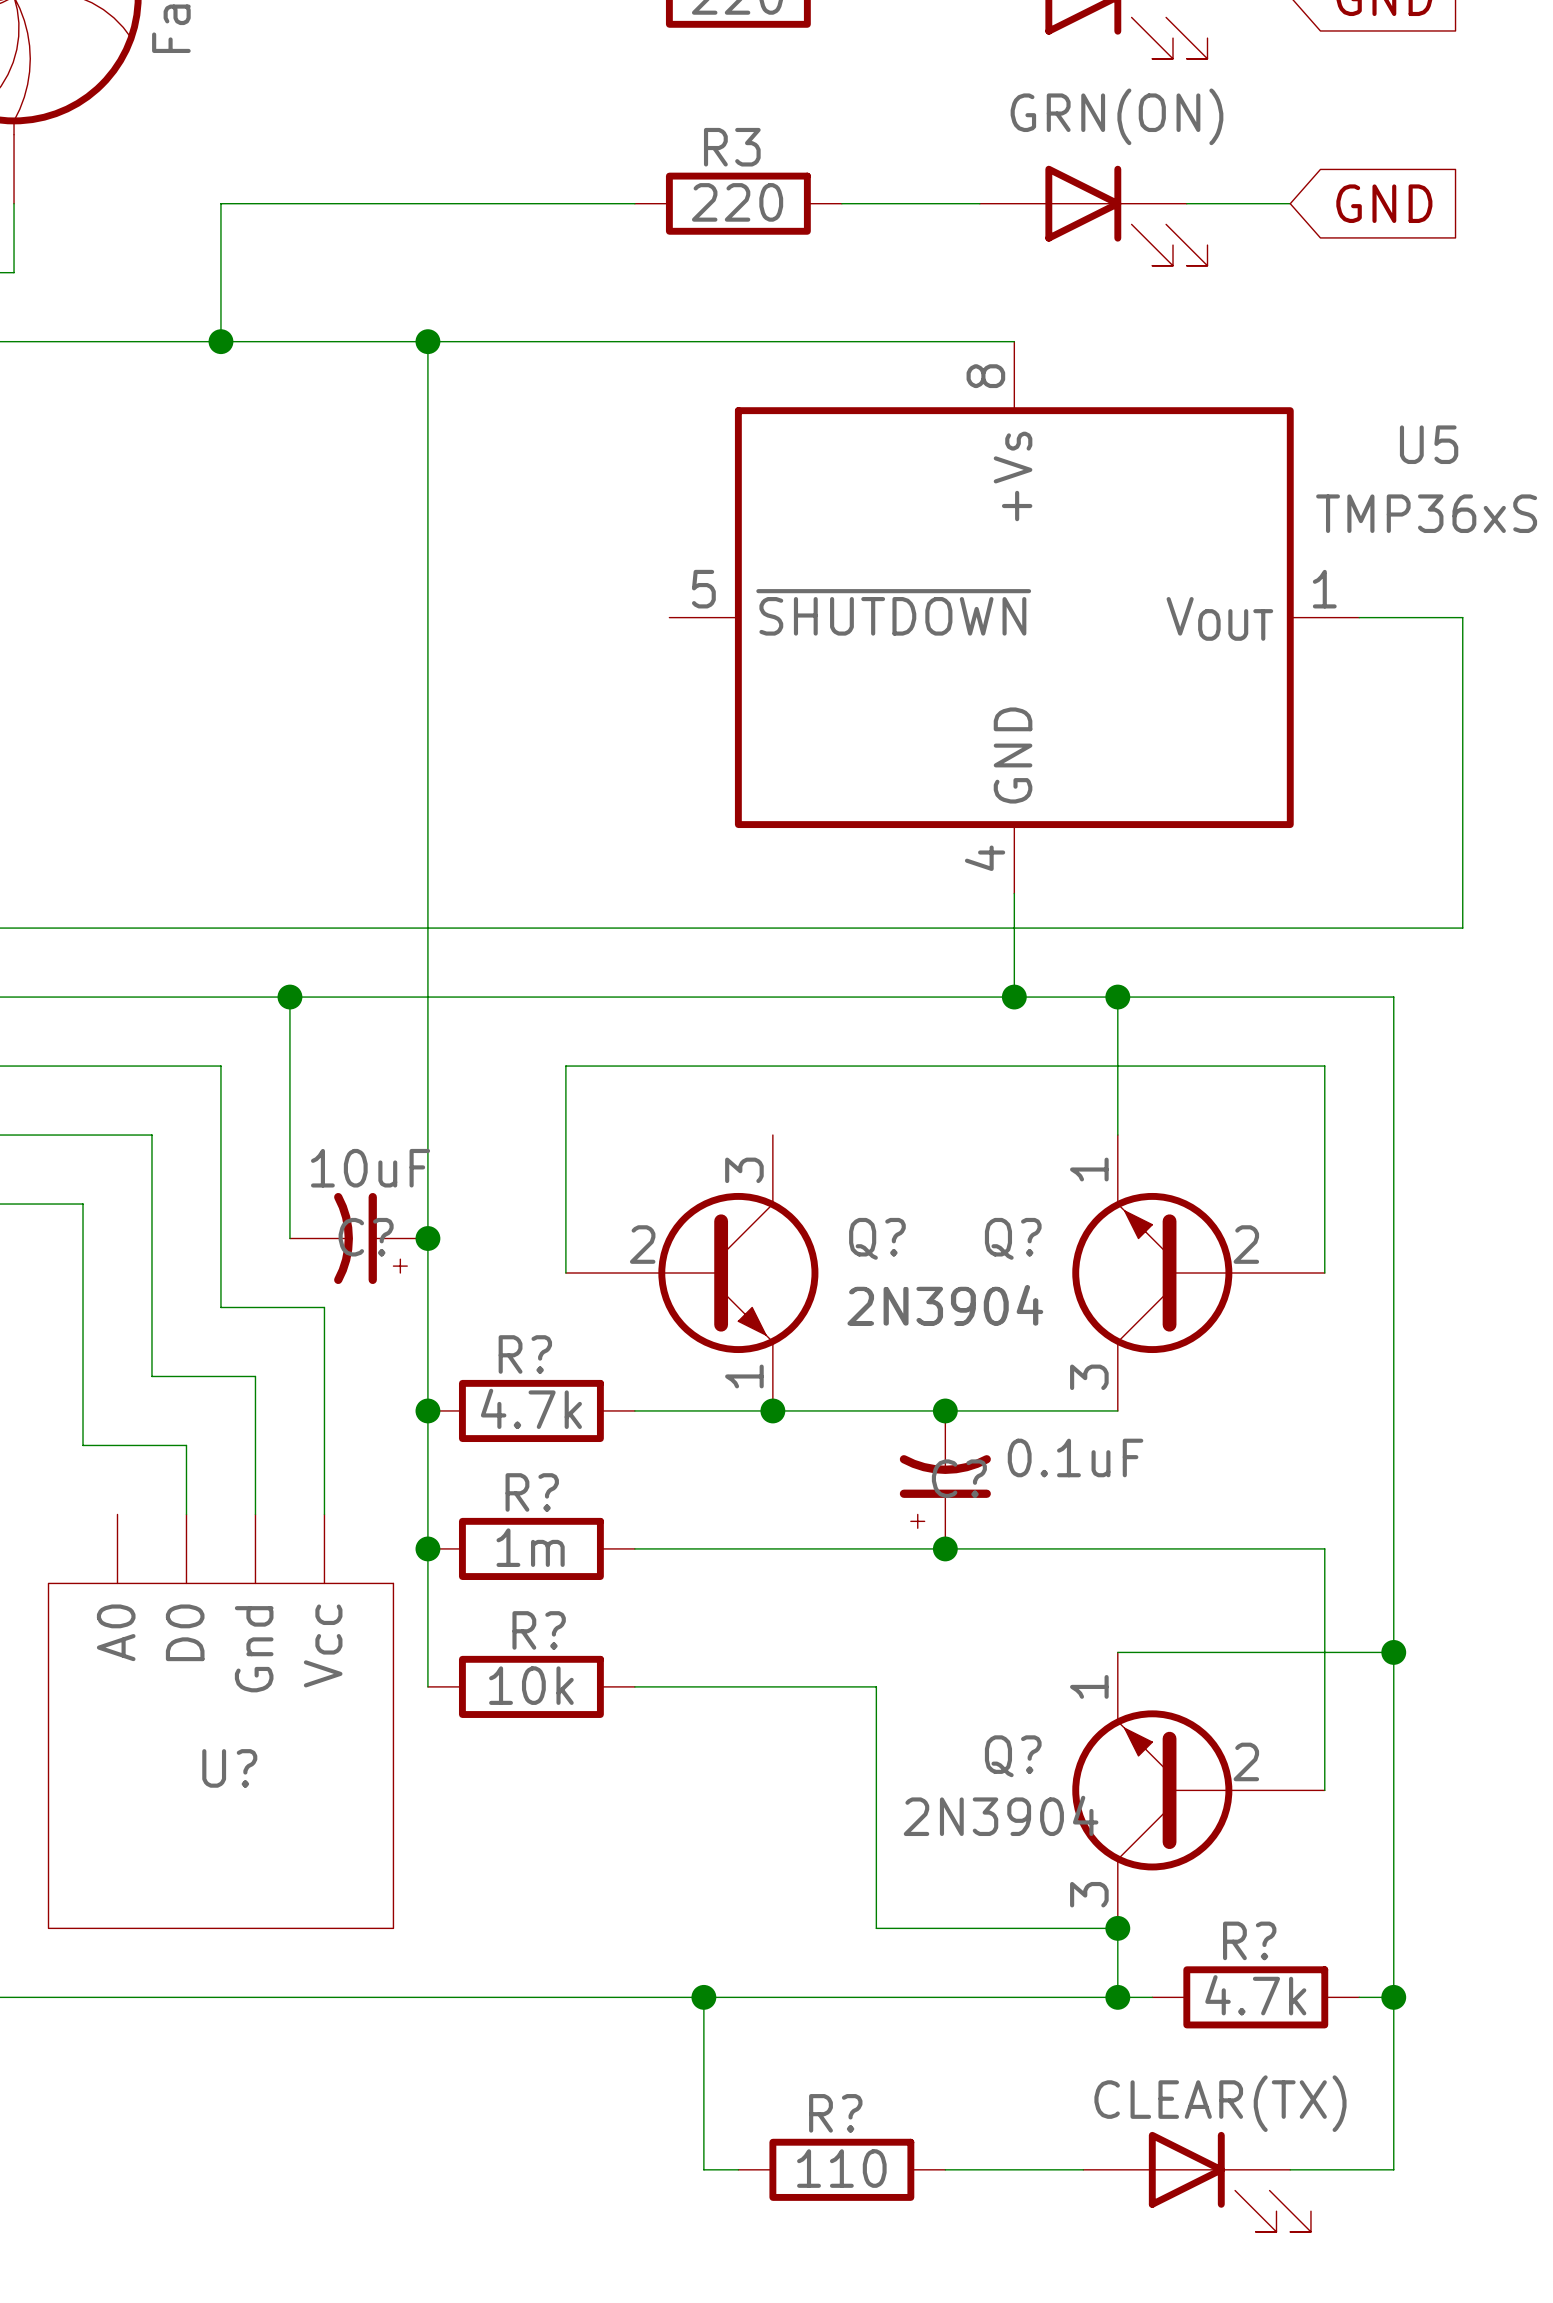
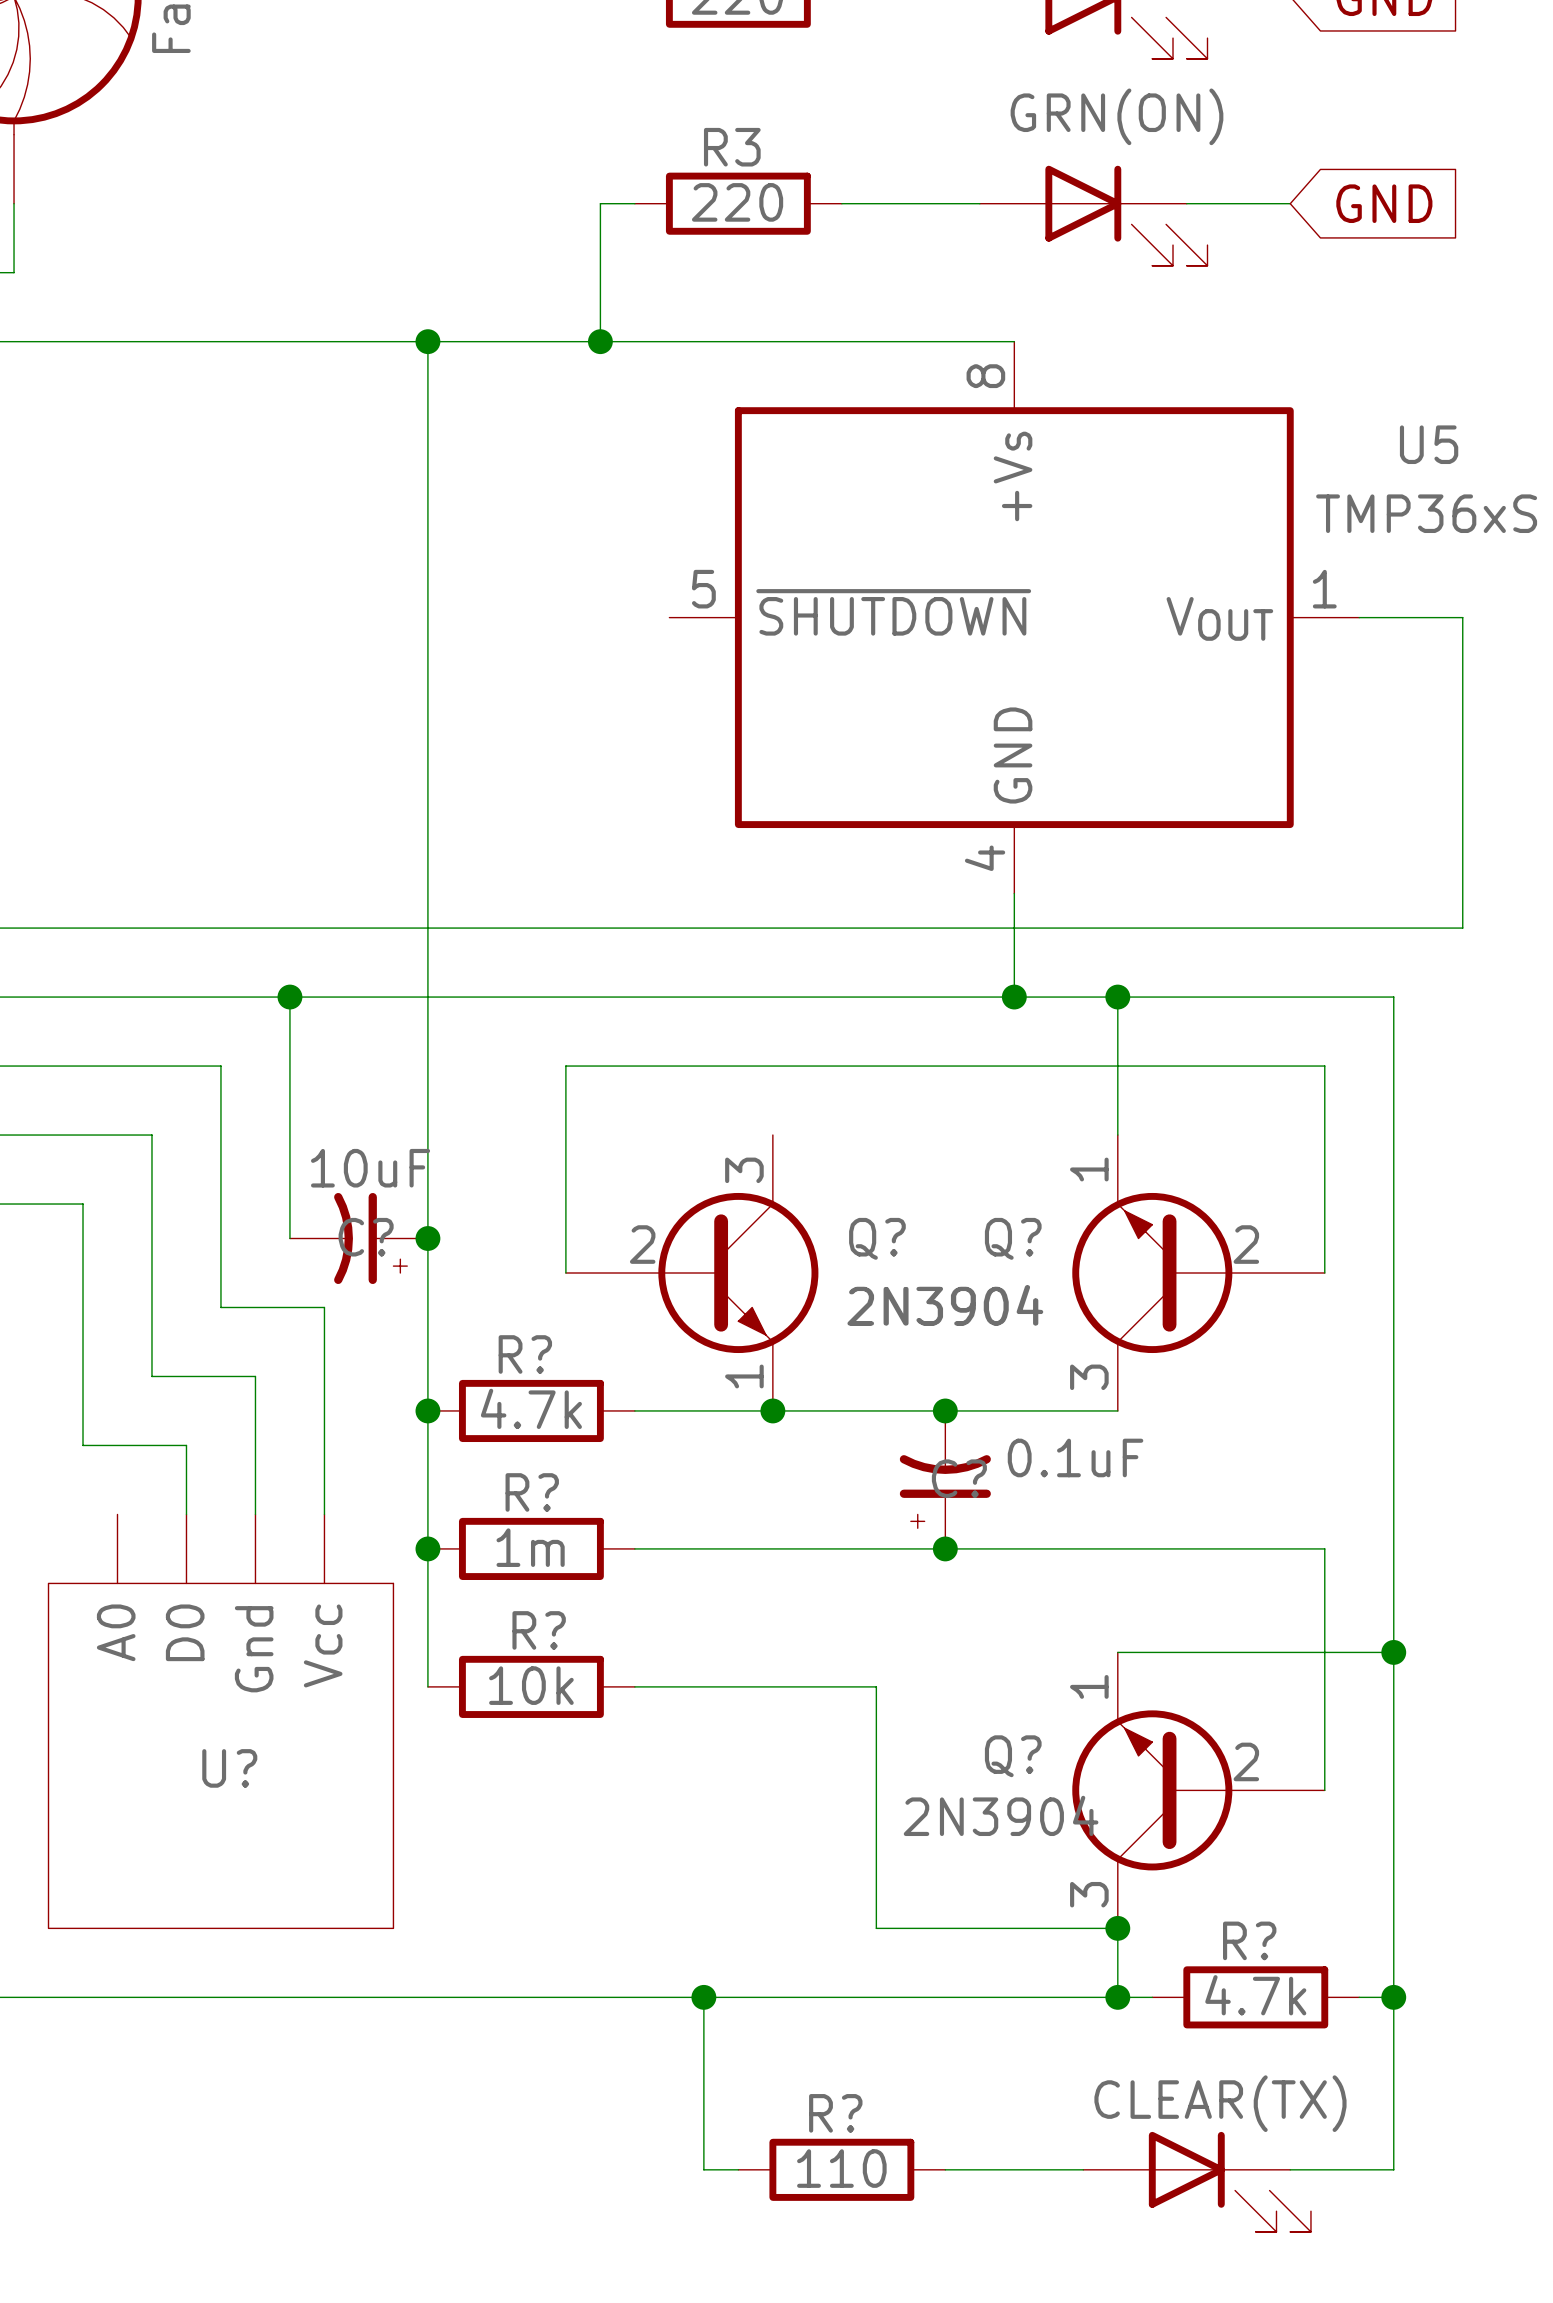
wire: (600, 203) (220, 203) (220, 341) -> (600, 203) (600, 341)
junction: (220, 341) -> none
junction: none -> (600, 341)

